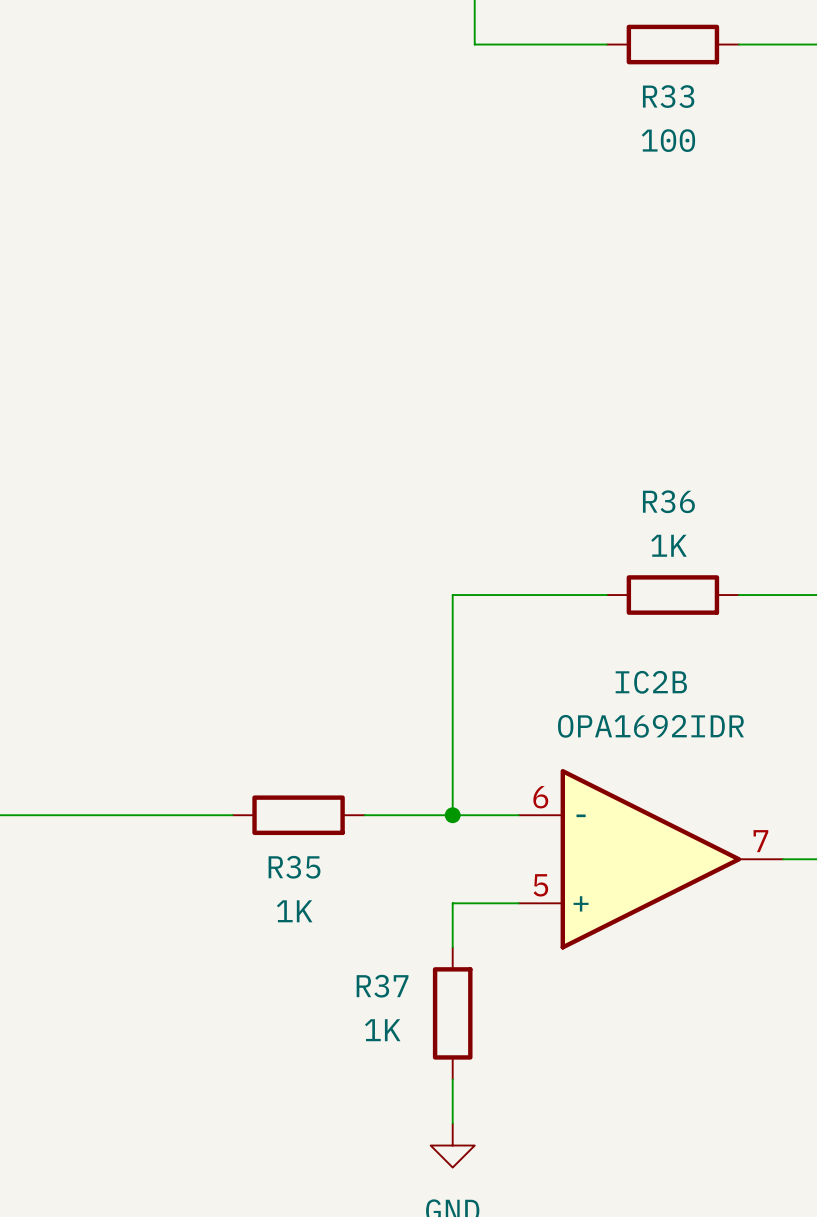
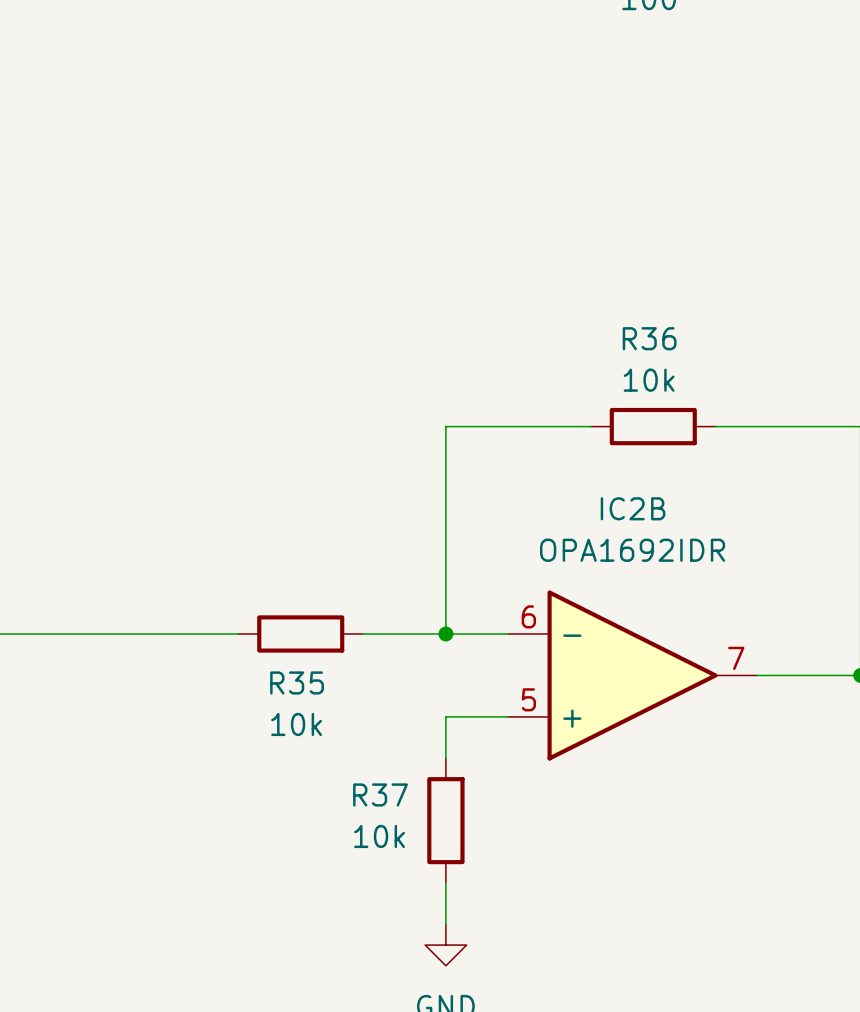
R36 value: 1K (668, 545) -> 10k (649, 380)
R35 value: 1K (294, 911) -> 10k (296, 724)
R37 value: 1K (382, 1030) -> 10k (379, 836)

